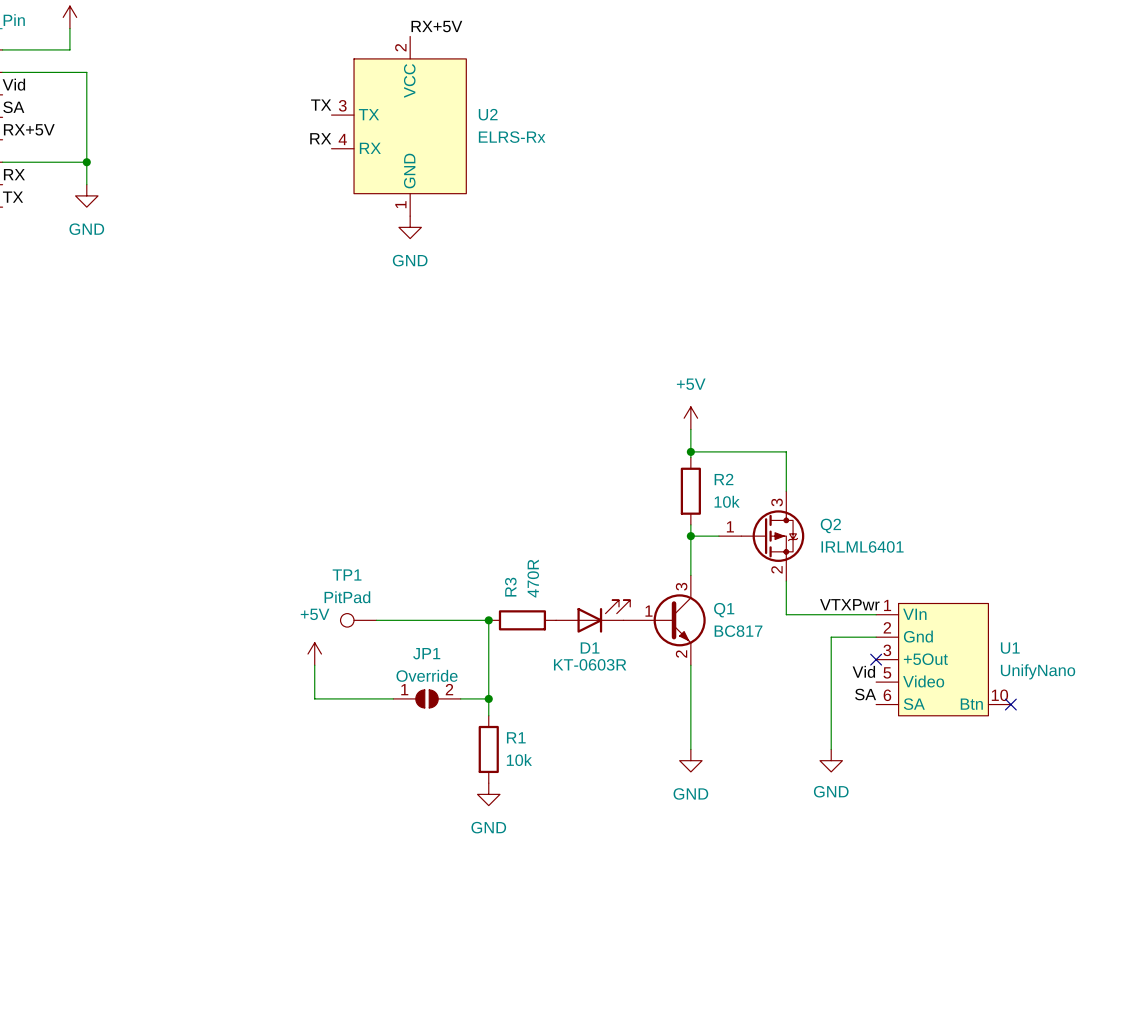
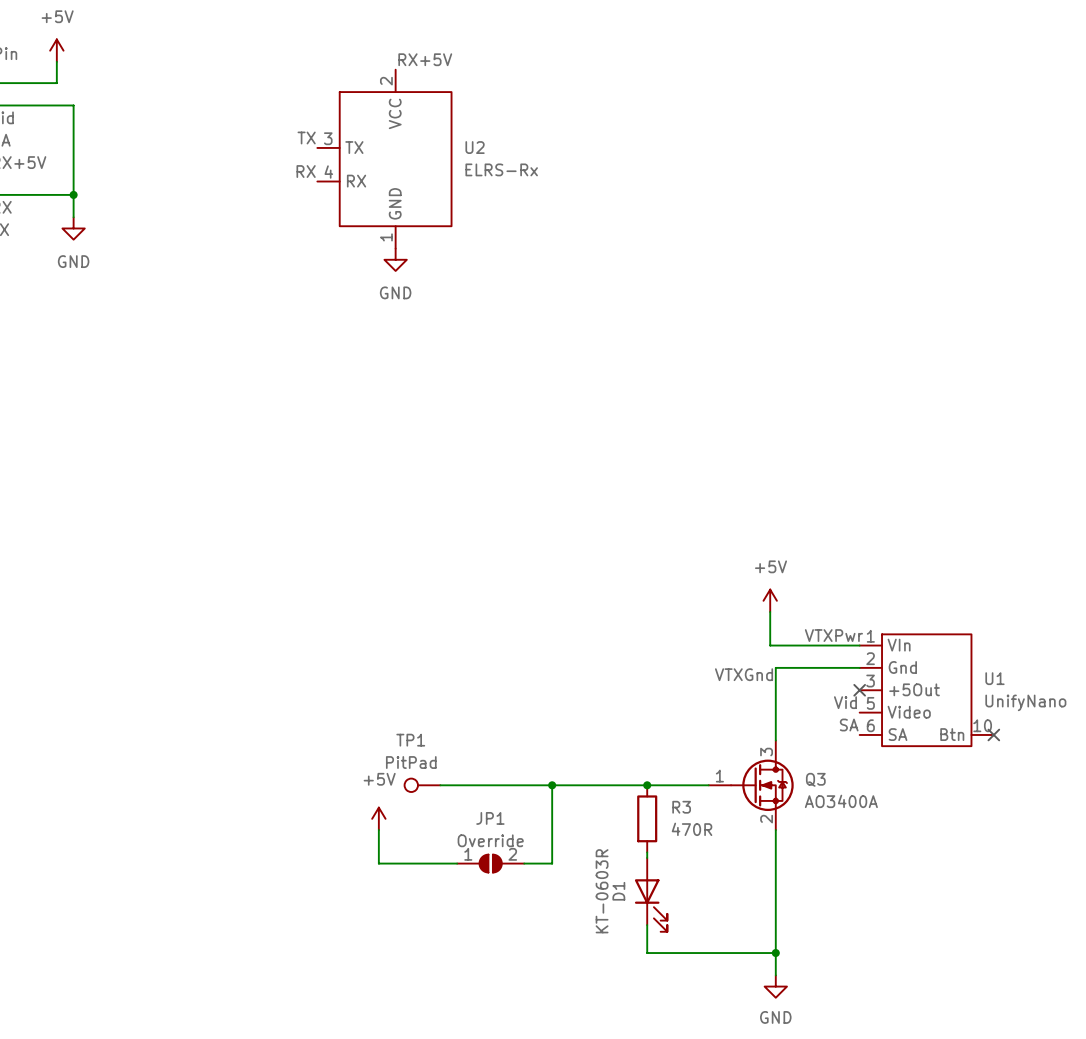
power symbol position: +5V (690, 418) -> +5V (770, 600)
wire: (690, 429) (690, 457) -> none
wire: (690, 451) (786, 451) (786, 491) -> none
junction: (690, 451) -> none
R2: 10k (690, 491) -> none
wire: (690, 524) (690, 575) -> none
wire: (690, 536) (718, 536) -> none
junction: (690, 536) -> none
Q2: IRLML6401 (761, 536) -> none
D1 position: (593, 616) -> (651, 894)
D1 rotation: 0° (603, 616) -> 90° clockwise (651, 905)
TP1 position: (358, 620) -> (422, 785)
wire: (376, 620) (488, 620) (488, 715) -> none
junction: (488, 620) -> none
R3 rotation: 0° (522, 620) -> 90° clockwise (647, 818)
R3 position: (522, 620) -> (647, 818)
Q1: BC817 (664, 620) -> none
wire: (831, 637) (831, 749) -> (814, 667) (775, 667) (775, 740)
label: none -> VTXGnd (744, 674)
power symbol position: +5V (314, 654) -> +5V (378, 818)
wire: (314, 665) (314, 698) (393, 698) -> (378, 830) (378, 863) (457, 863)
wire: (690, 665) (690, 749) -> none
JP1 position: (427, 698) -> (490, 863)
wire: (460, 698) (488, 698) -> none
junction: (488, 698) -> none
R1: 10k (488, 749) -> none
wire: none -> (440, 785) (708, 785)
wire: none -> (552, 785) (552, 863) (524, 863)
junction: none -> (552, 785)
junction: none -> (647, 785)
Q3: none -> AO3400A (751, 785)
power symbol: GND (690, 760) -> none
power symbol: GND (831, 760) -> none
power symbol: GND (488, 794) -> none
wire: none -> (775, 830) (775, 975)
wire: none -> (647, 852) (647, 857)
wire: none -> (647, 925) (647, 953) (775, 953)
junction: none -> (775, 953)
power symbol: none -> GND (775, 986)

